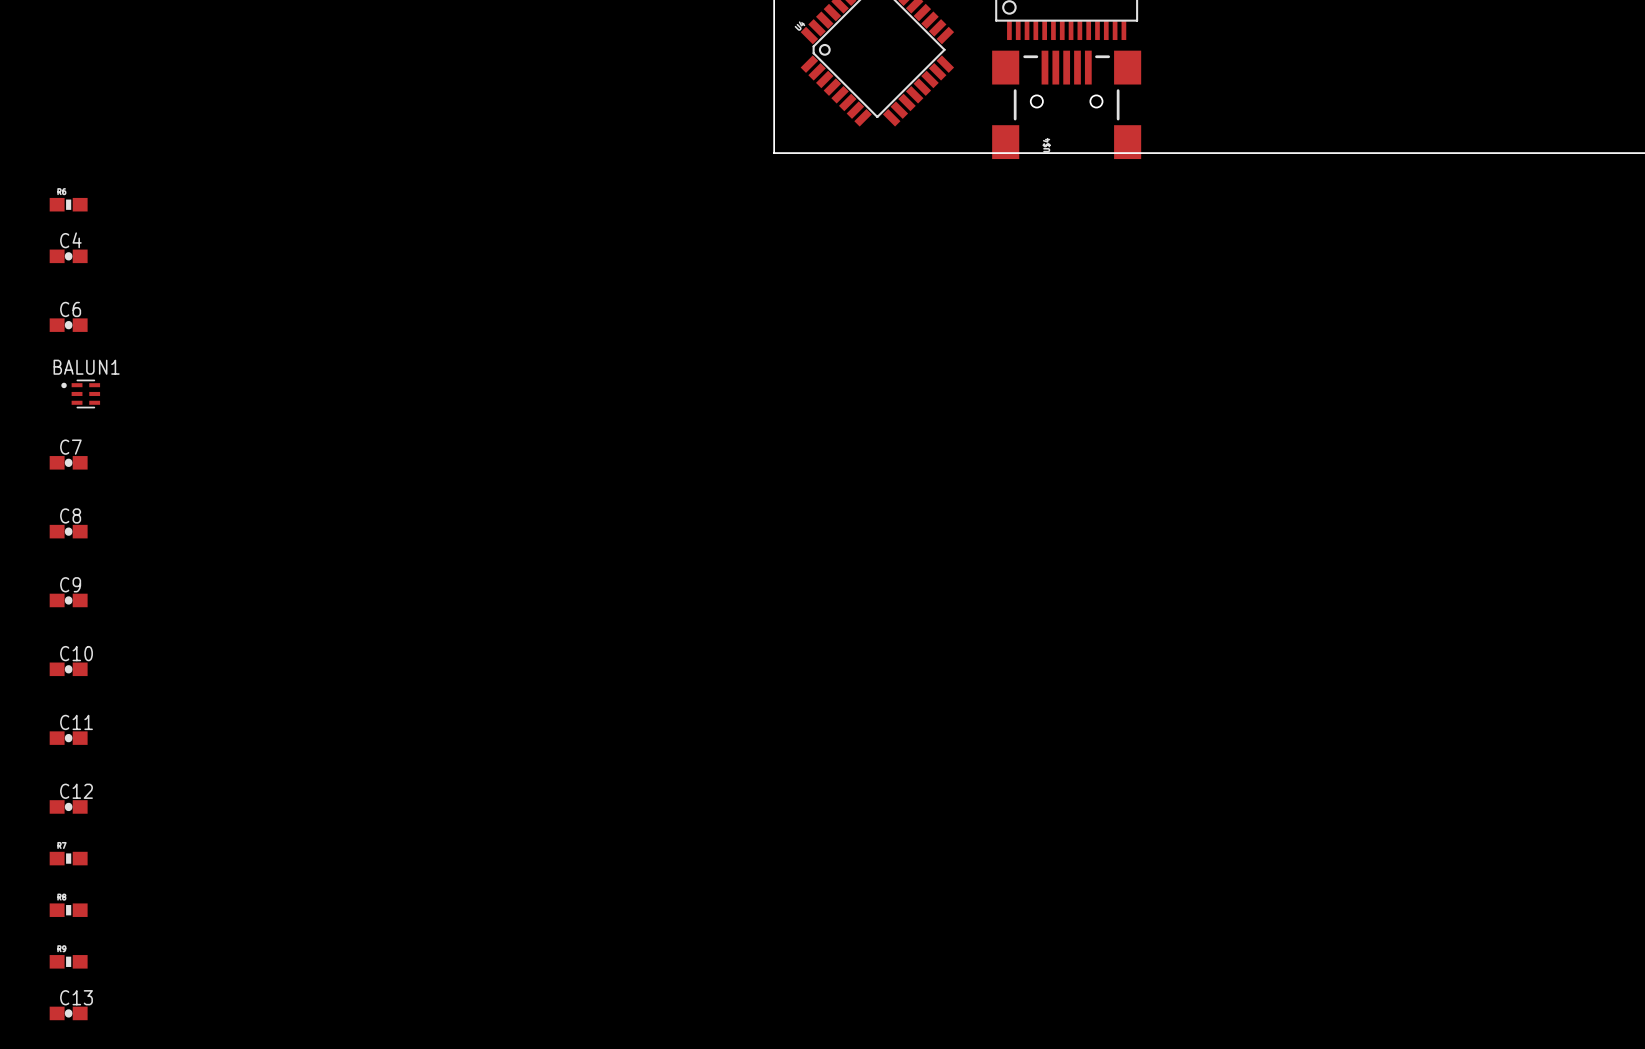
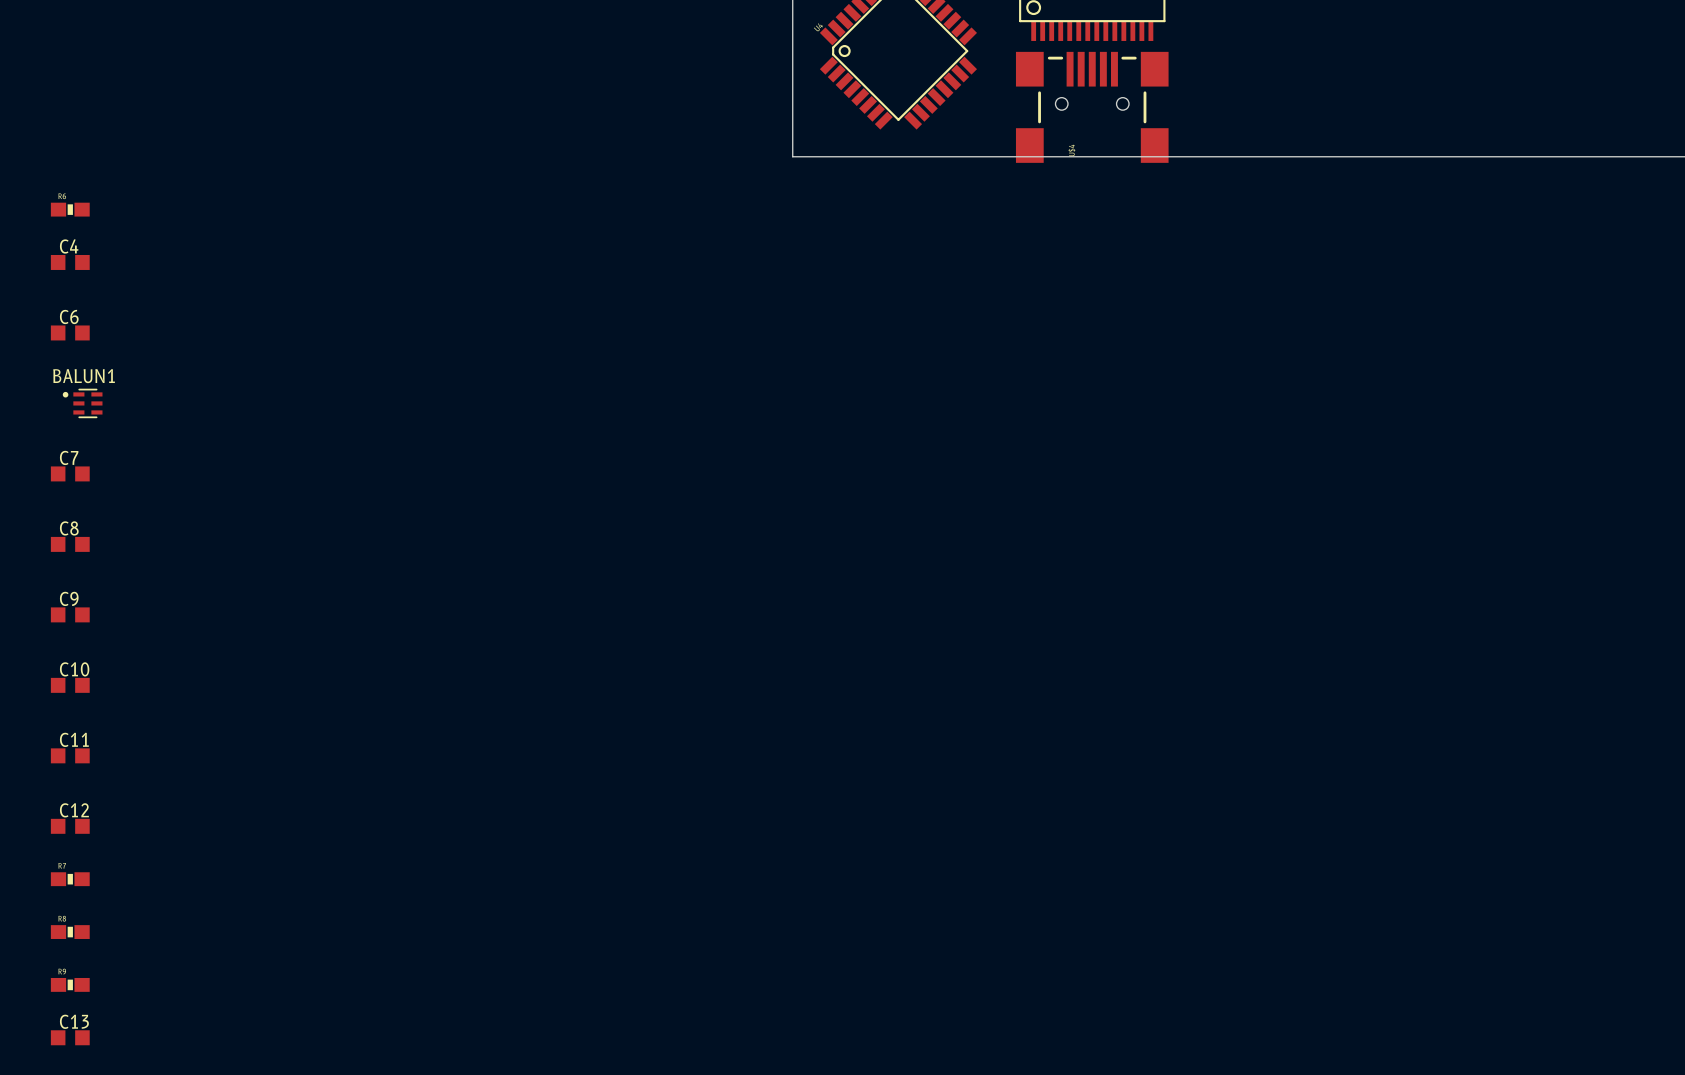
C4 footprint: [49, 249, 88, 264] -> [50, 254, 90, 270]
C6 footprint: [49, 318, 88, 332] -> [50, 325, 90, 341]
C7 footprint: [49, 456, 88, 470] -> [50, 466, 90, 482]
C8 footprint: [49, 524, 88, 539] -> [50, 536, 90, 552]
C9 footprint: [49, 593, 88, 608] -> [50, 607, 90, 623]
C10 footprint: [49, 662, 88, 677] -> [50, 677, 90, 693]
C11 footprint: [49, 731, 88, 745] -> [50, 748, 90, 764]
C12 footprint: [49, 800, 88, 814] -> [50, 818, 90, 834]
C13 footprint: [49, 1006, 88, 1021] -> [50, 1030, 90, 1046]

